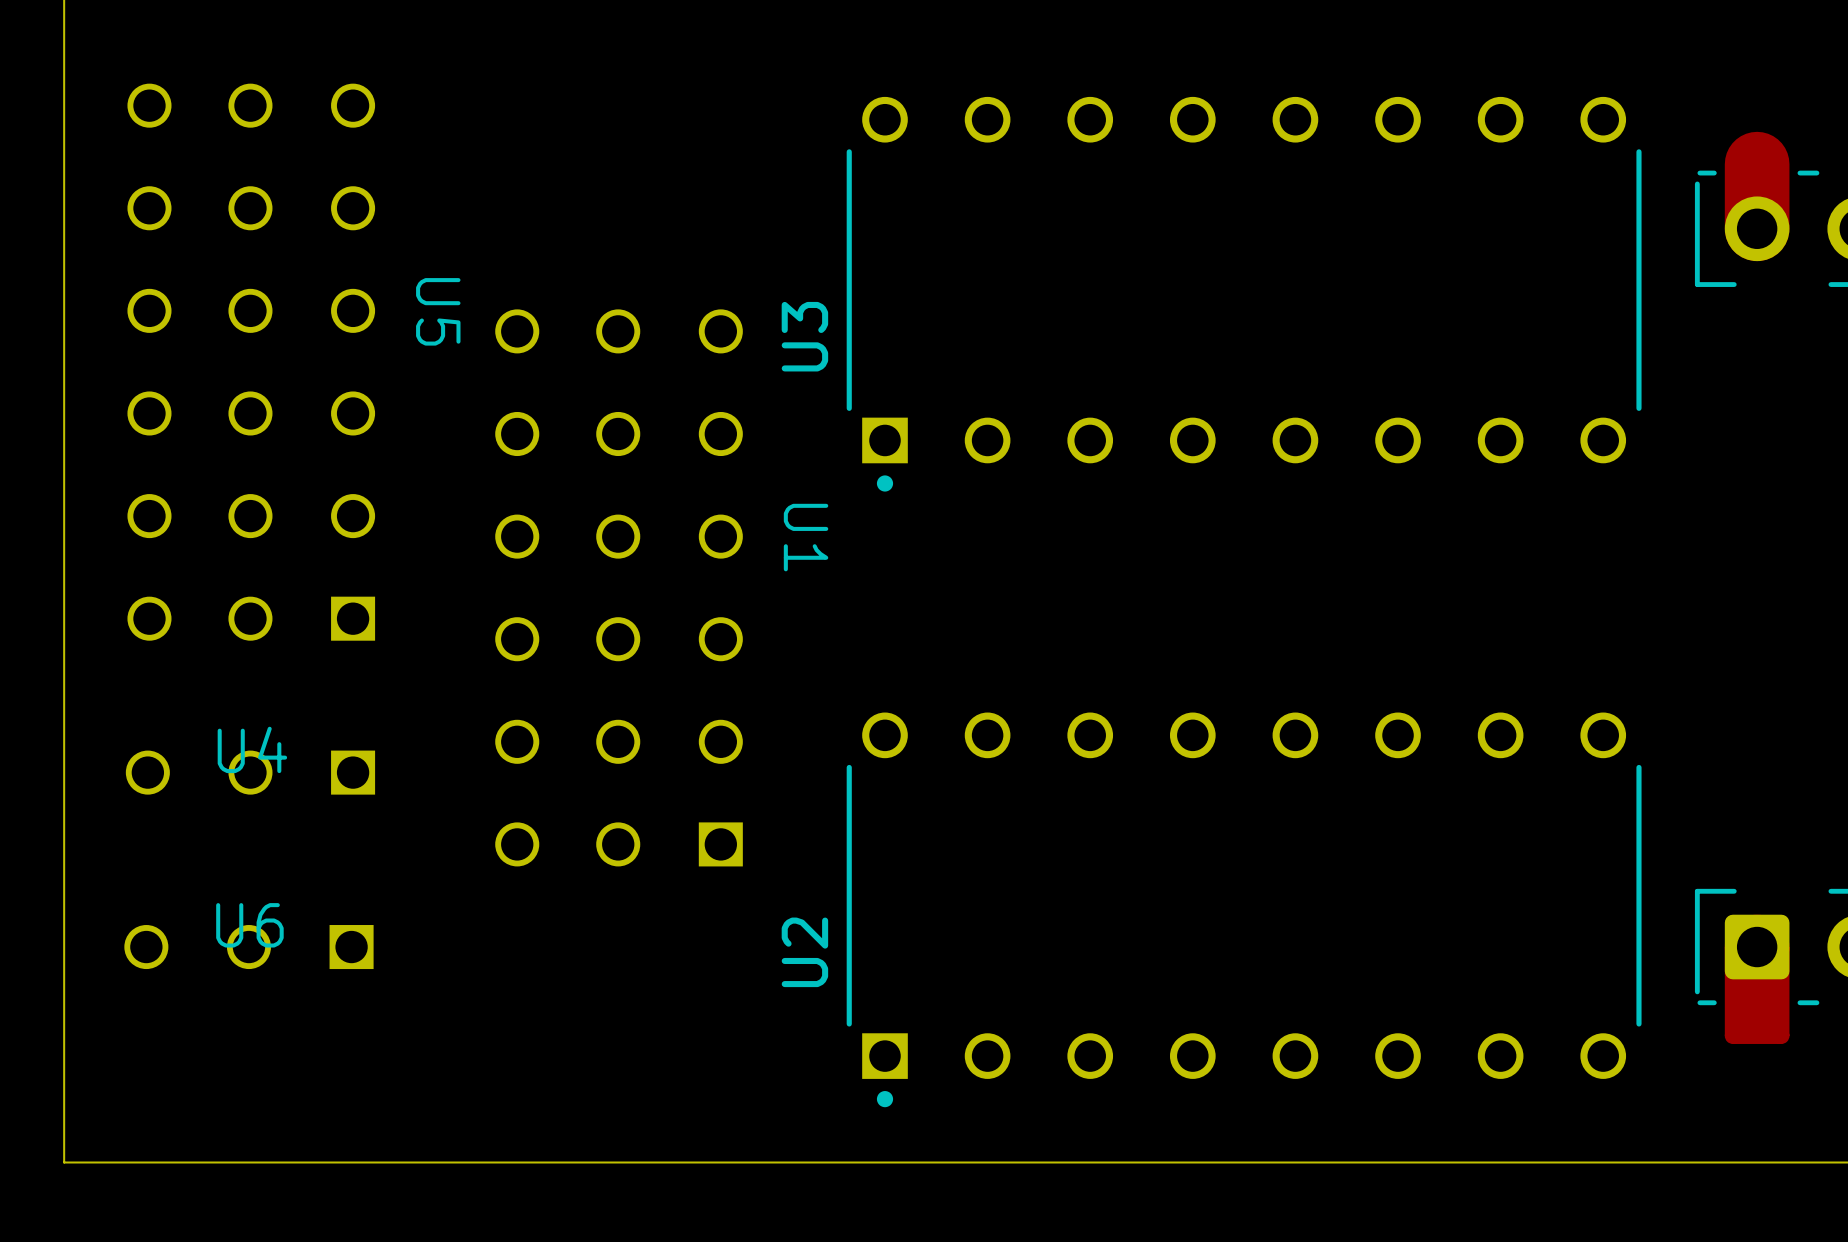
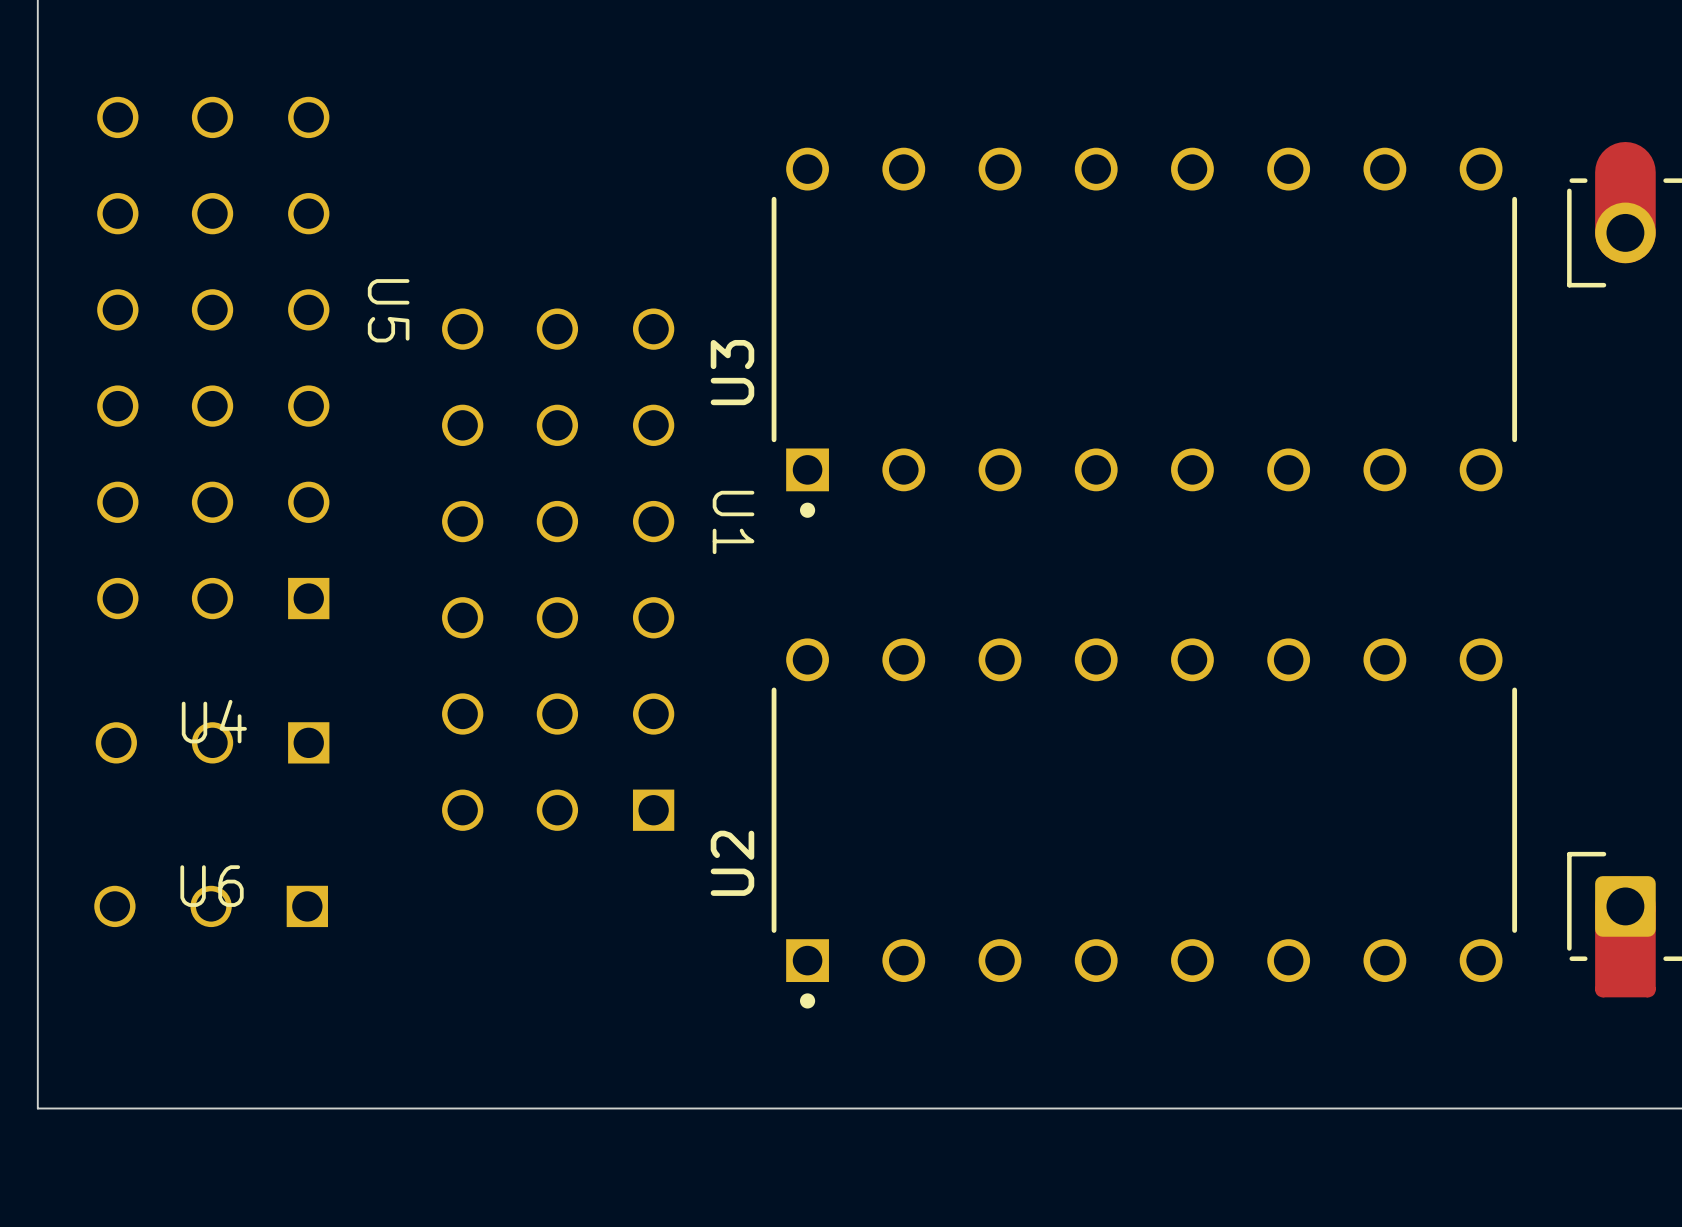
U3 position: (1244, 294) -> (1144, 332)
U2 position: (1244, 909) -> (1144, 823)

